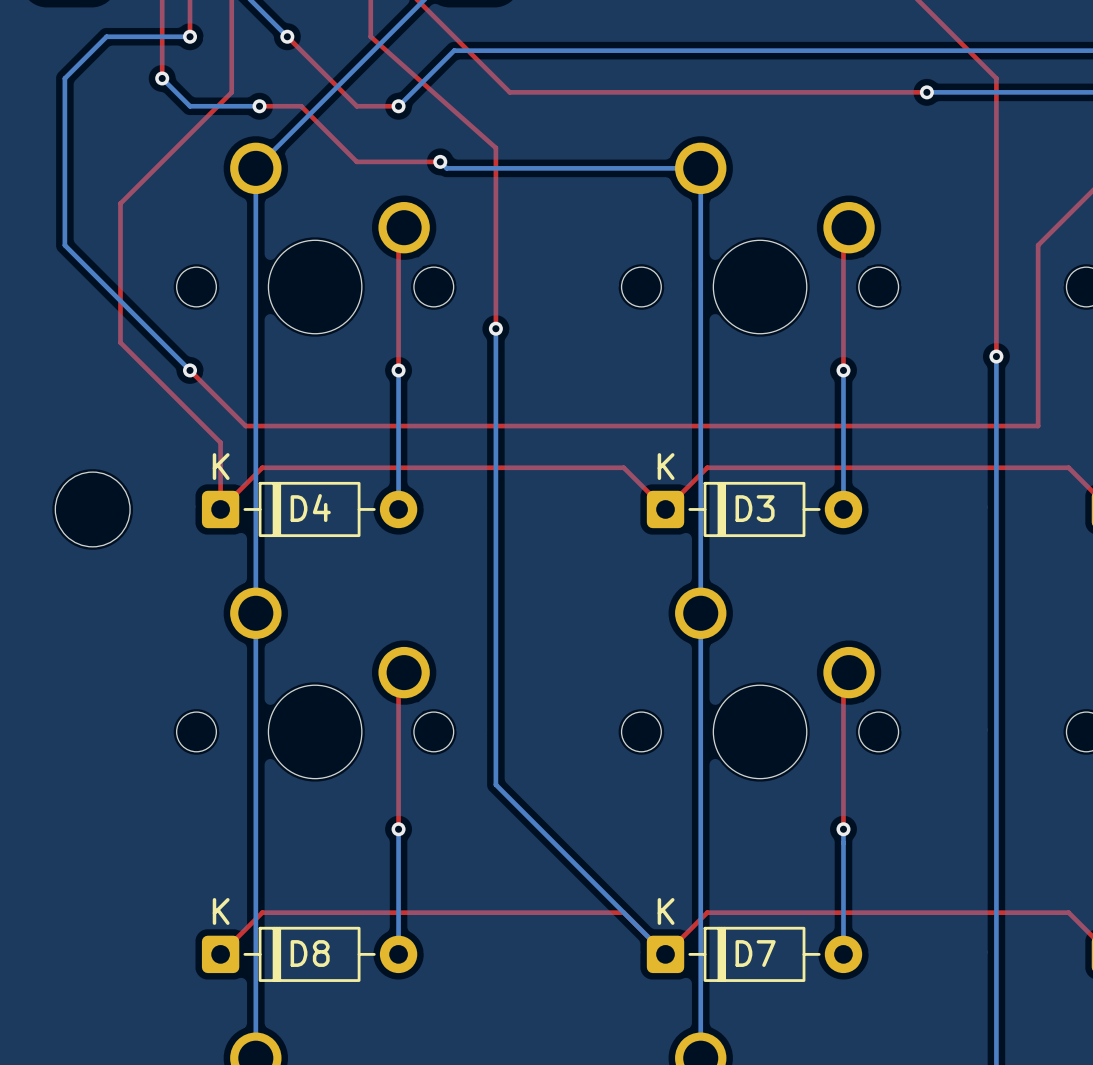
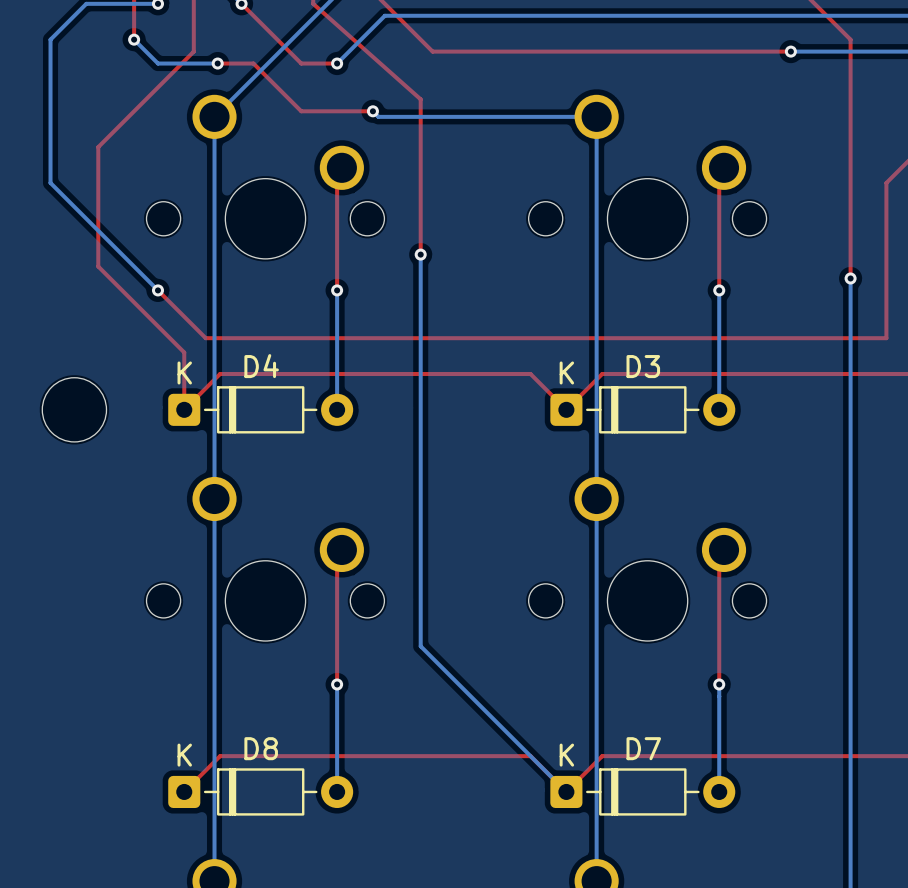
D4 name position: D4 (310, 508) -> D4 (261, 366)
D3 name position: D3 (755, 508) -> D3 (643, 366)
D8 name position: D8 (310, 953) -> D8 (261, 748)
D7 name position: D7 (755, 953) -> D7 (643, 748)

